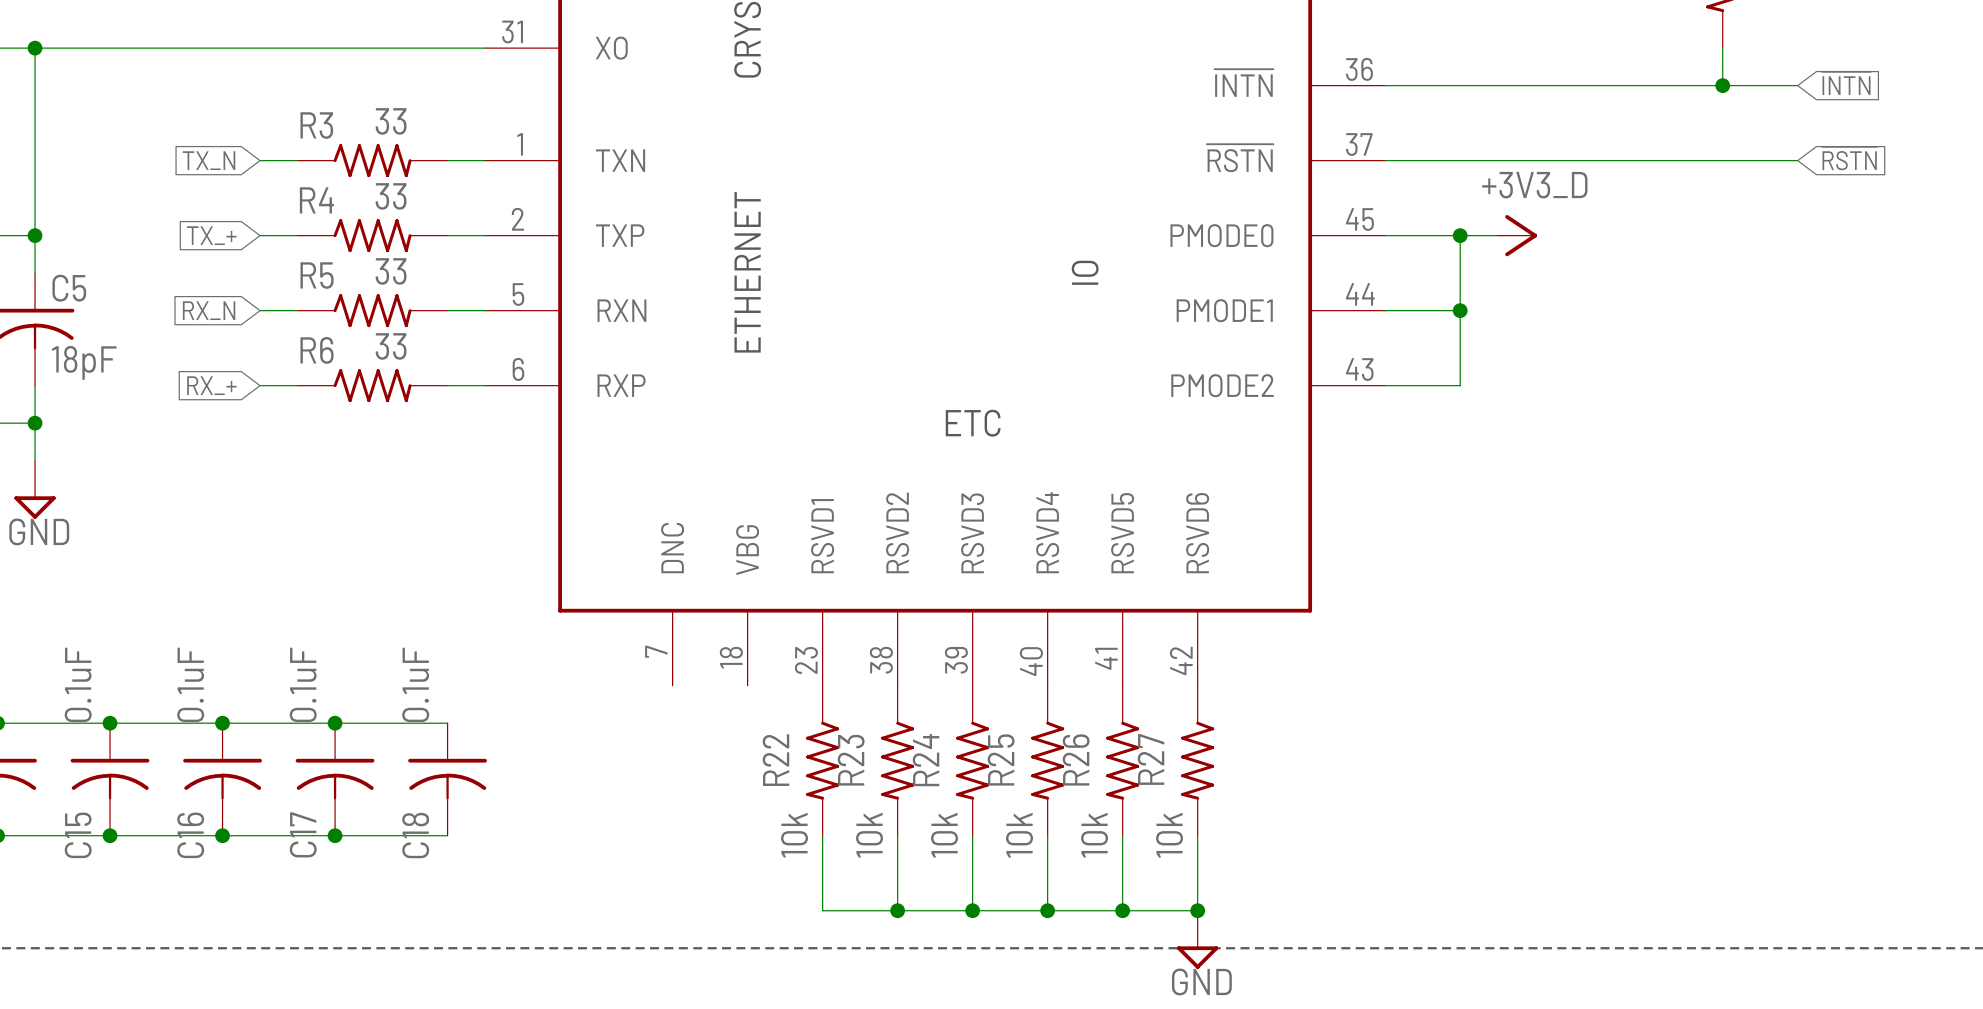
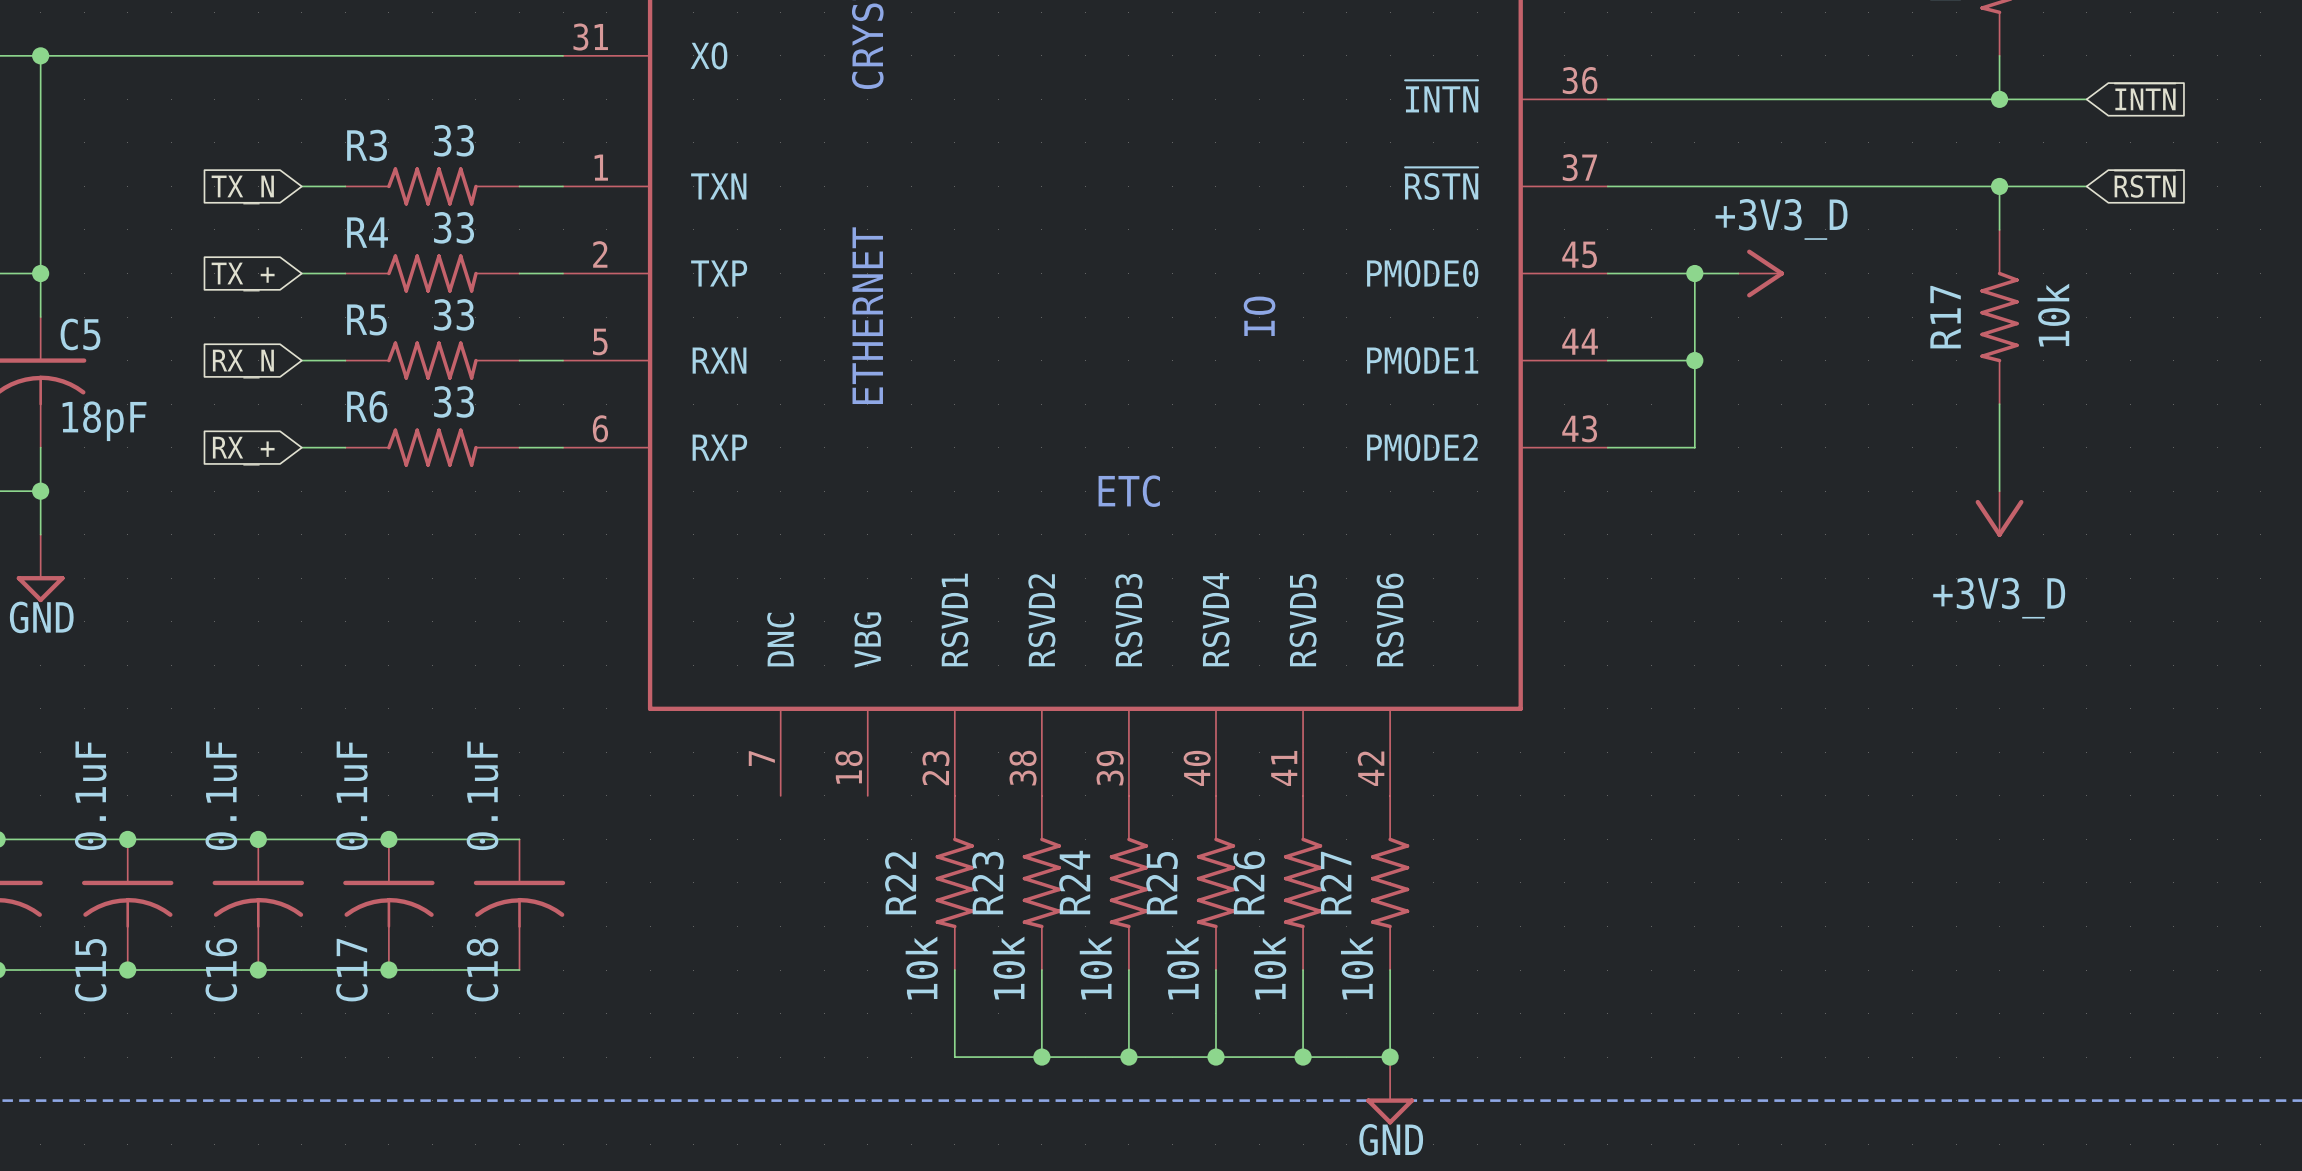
wire: none -> (1999, 186) (1999, 229)
junction: none -> (1999, 186)
R17: none -> 10k (1999, 317)
wire: none -> (1999, 404) (1999, 491)
power symbol: none -> +3V3_D (1999, 514)

